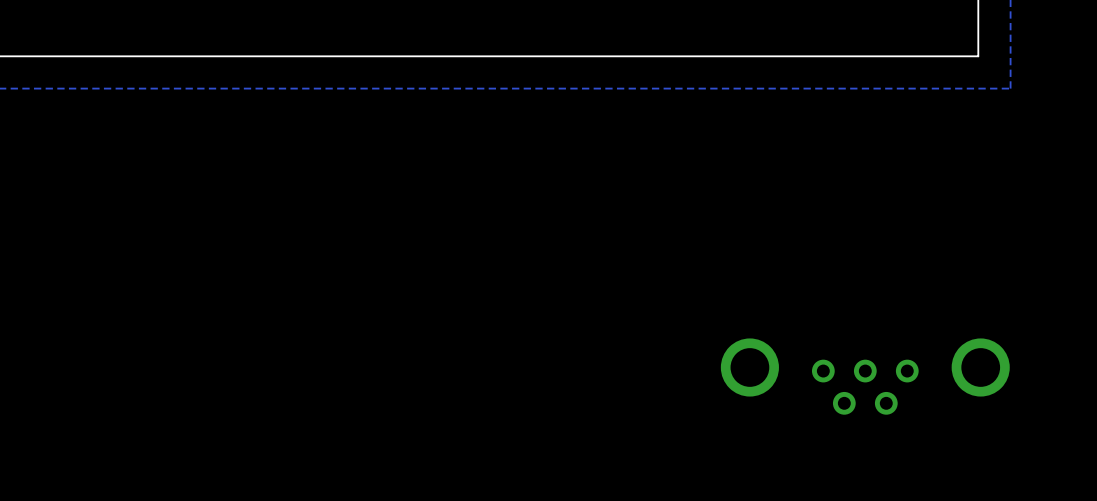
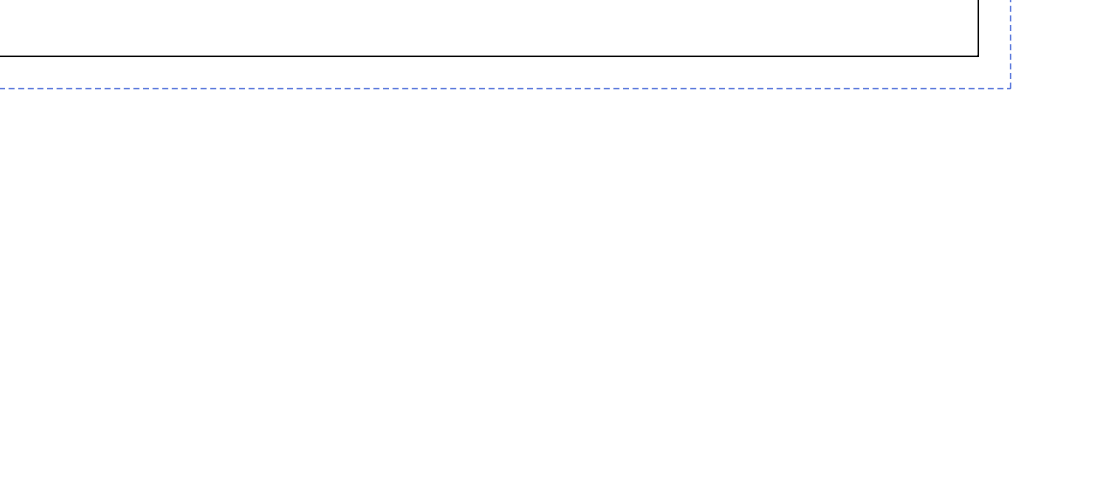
part: (865, 376) -> none

